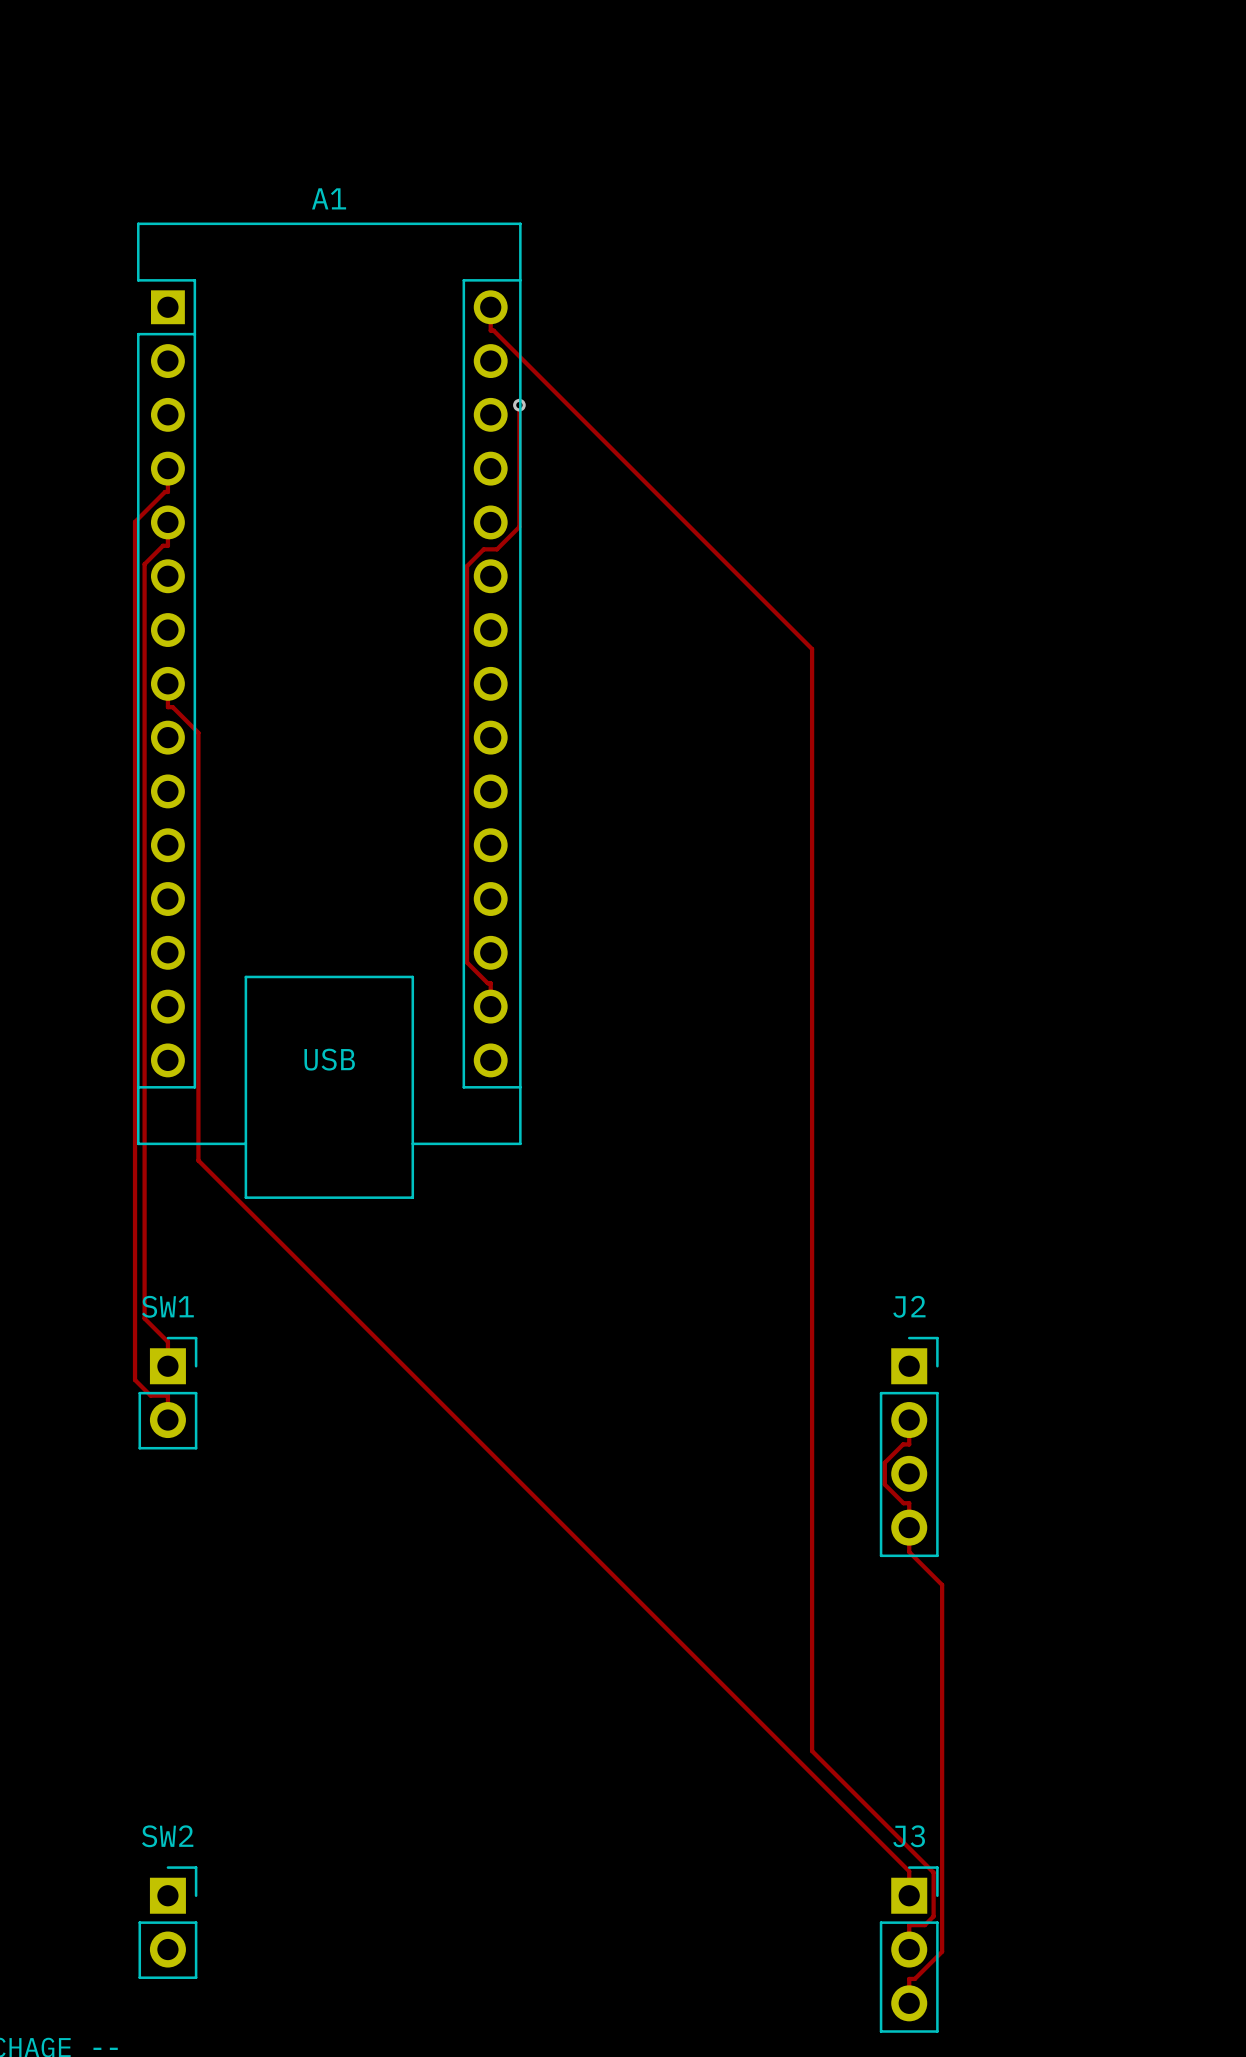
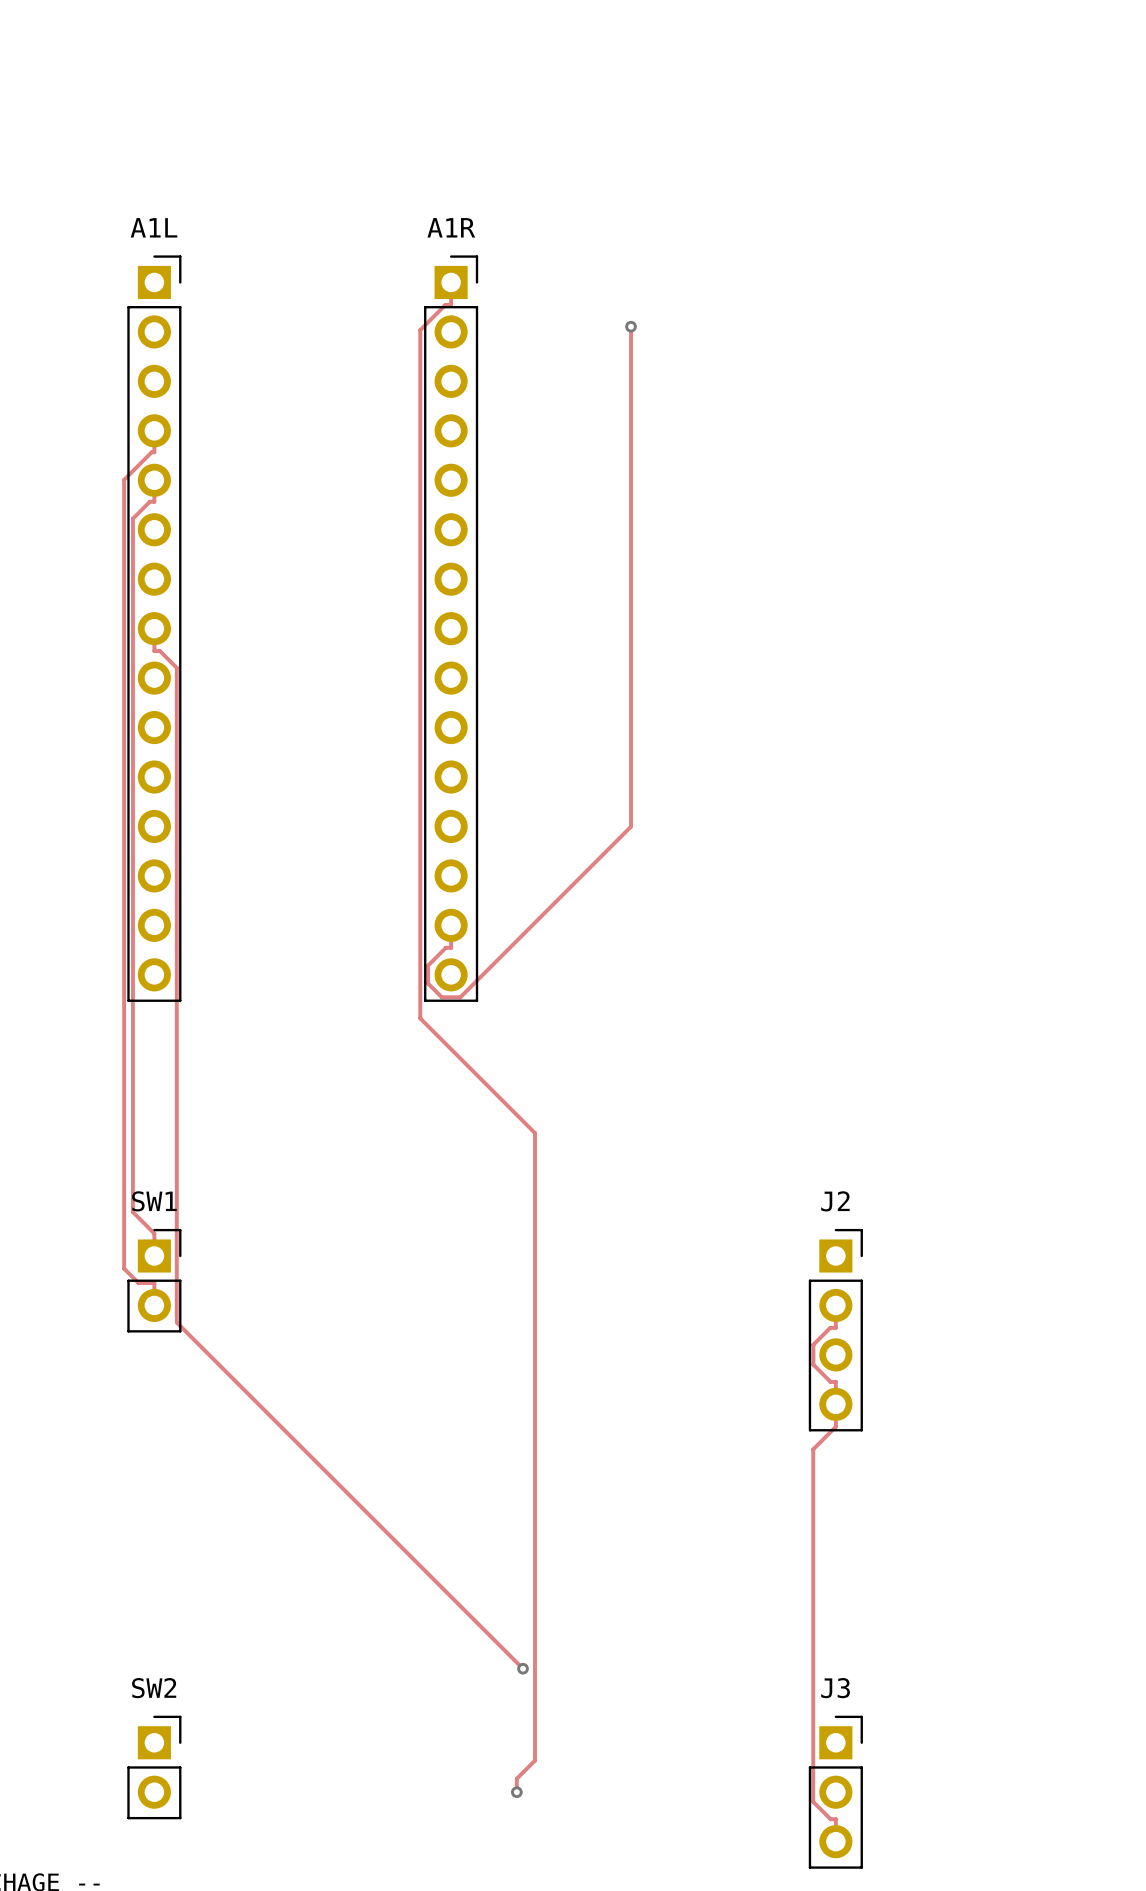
track: (490, 330) (493, 330) (812, 649) (812, 1751) (933, 1872) (933, 1916) (924, 1925) (909, 1925) (909, 1949) -> (451, 303) (445, 304) (420, 330) (420, 1018) (534, 1133) (534, 1760) (516, 1778) (516, 1792)
via: none -> (631, 326)
track: (519, 405) (519, 526) (497, 549) (483, 549) (467, 566) (467, 962) (487, 983) (490, 983) (490, 1006) -> (631, 326) (631, 826) (460, 997) (441, 997) (428, 983) (428, 965) (445, 947) (451, 947) (451, 925)
via: (519, 405) -> none
A1L: none -> (154, 628)
A1R: none -> (451, 628)
track: (167, 707) (172, 707) (198, 732) (198, 1160) (909, 1871) (909, 1895) -> (154, 650) (159, 651) (176, 667) (176, 1322) (523, 1668)
A1: (329, 710) -> none
track: (909, 1552) (942, 1584) (942, 1951) (914, 1978) (909, 1978) -> (835, 1426) (813, 1449) (813, 1801) (830, 1819) (835, 1819)
via: none -> (523, 1668)
via: none -> (516, 1792)

